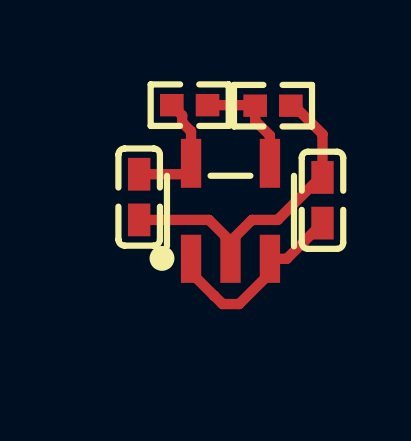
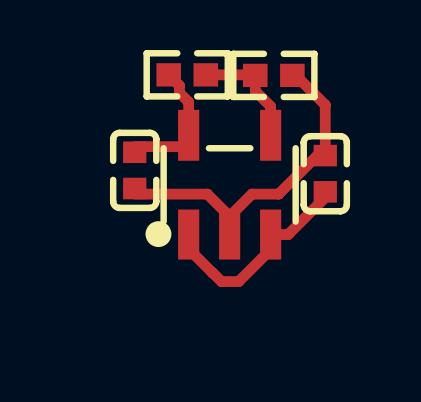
part footprint: [115, 145, 164, 249] -> [109, 129, 160, 212]
part footprint: [298, 148, 347, 252] -> [300, 132, 351, 215]

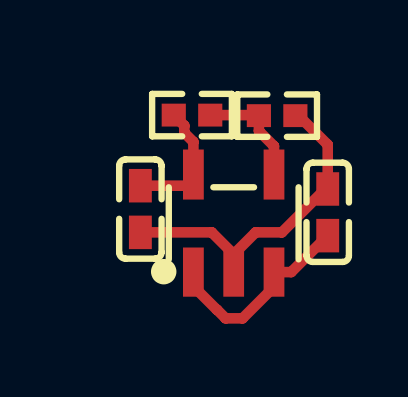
part footprint: [109, 129, 160, 212] -> [115, 156, 165, 262]
part footprint: [300, 132, 351, 215] -> [303, 159, 353, 266]

